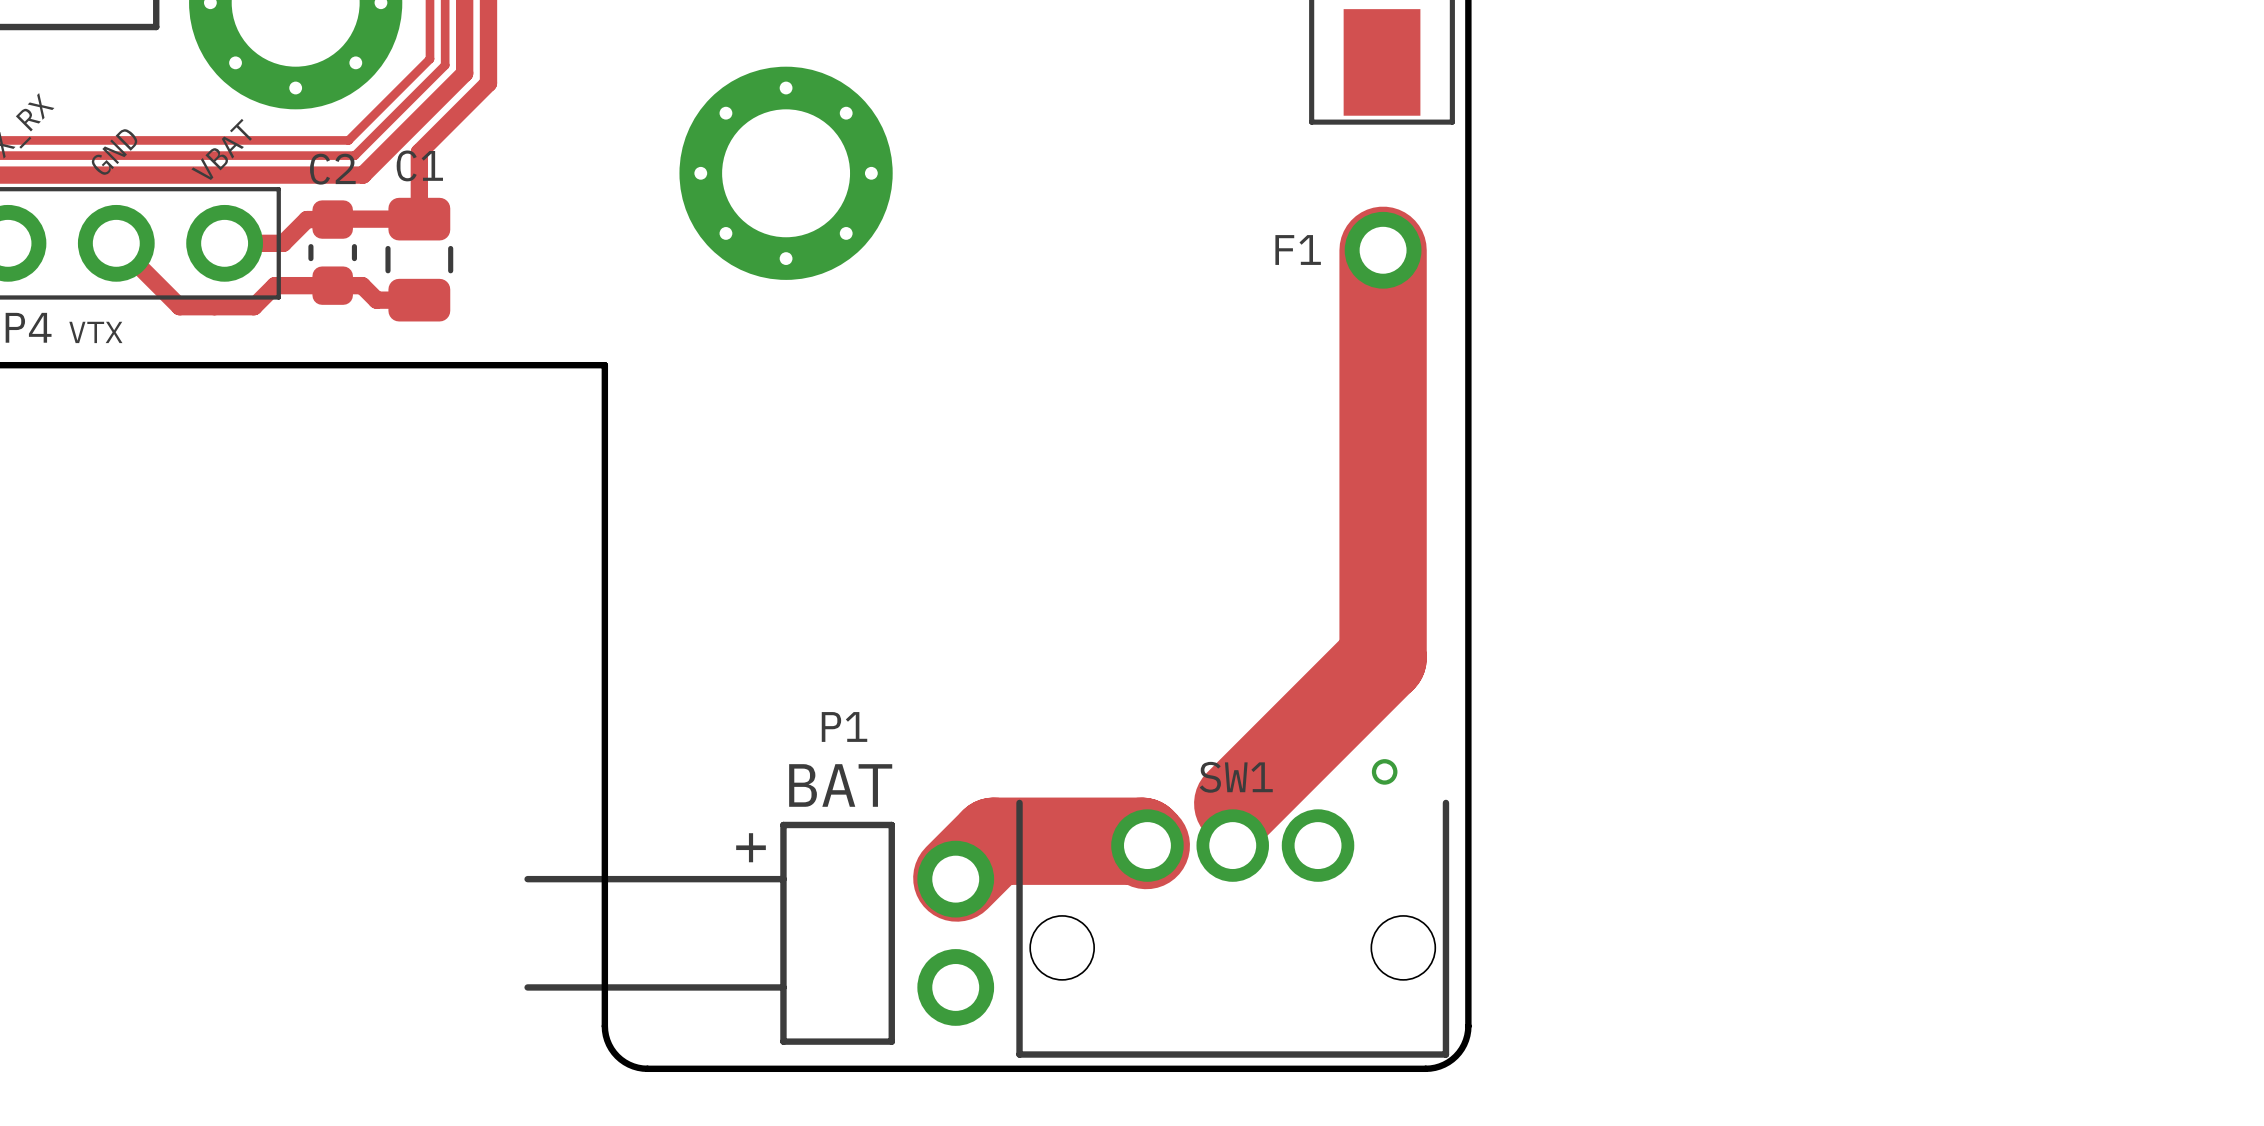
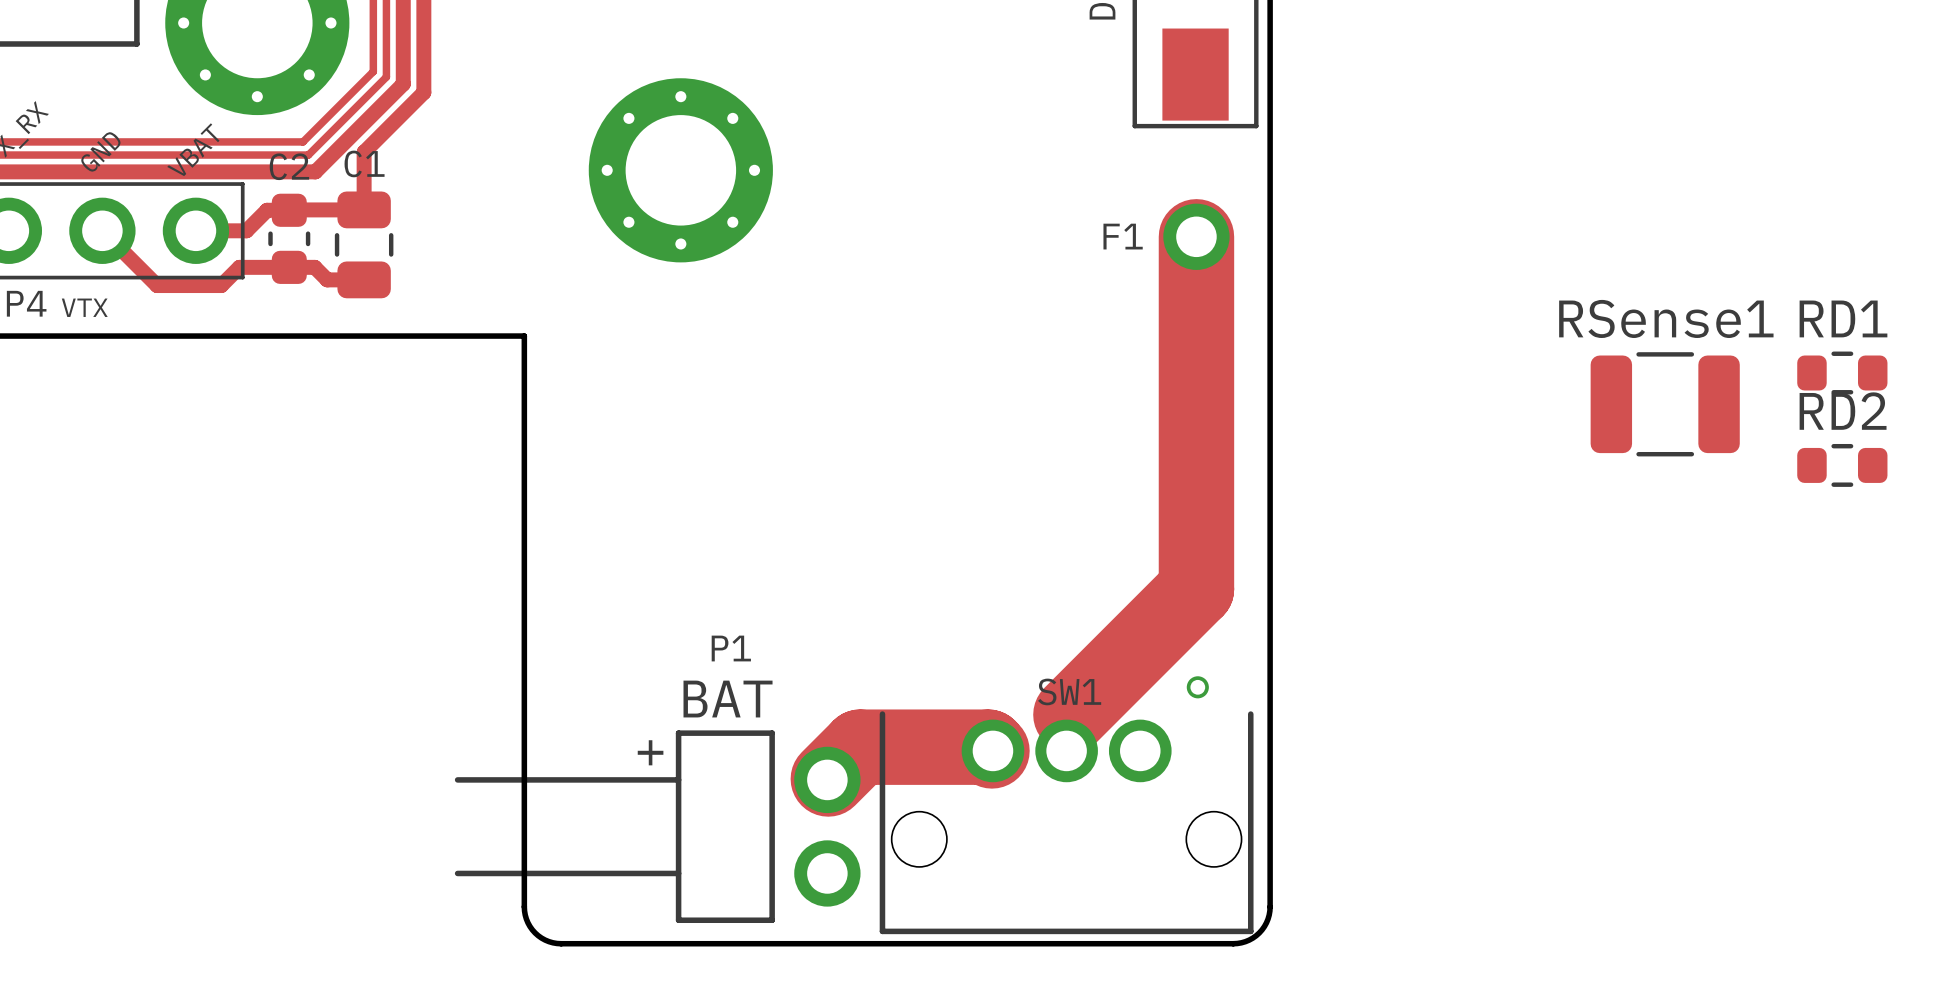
RD1: none -> (1842, 372)
RSense1: none -> (1665, 404)
RD2: none -> (1842, 465)

